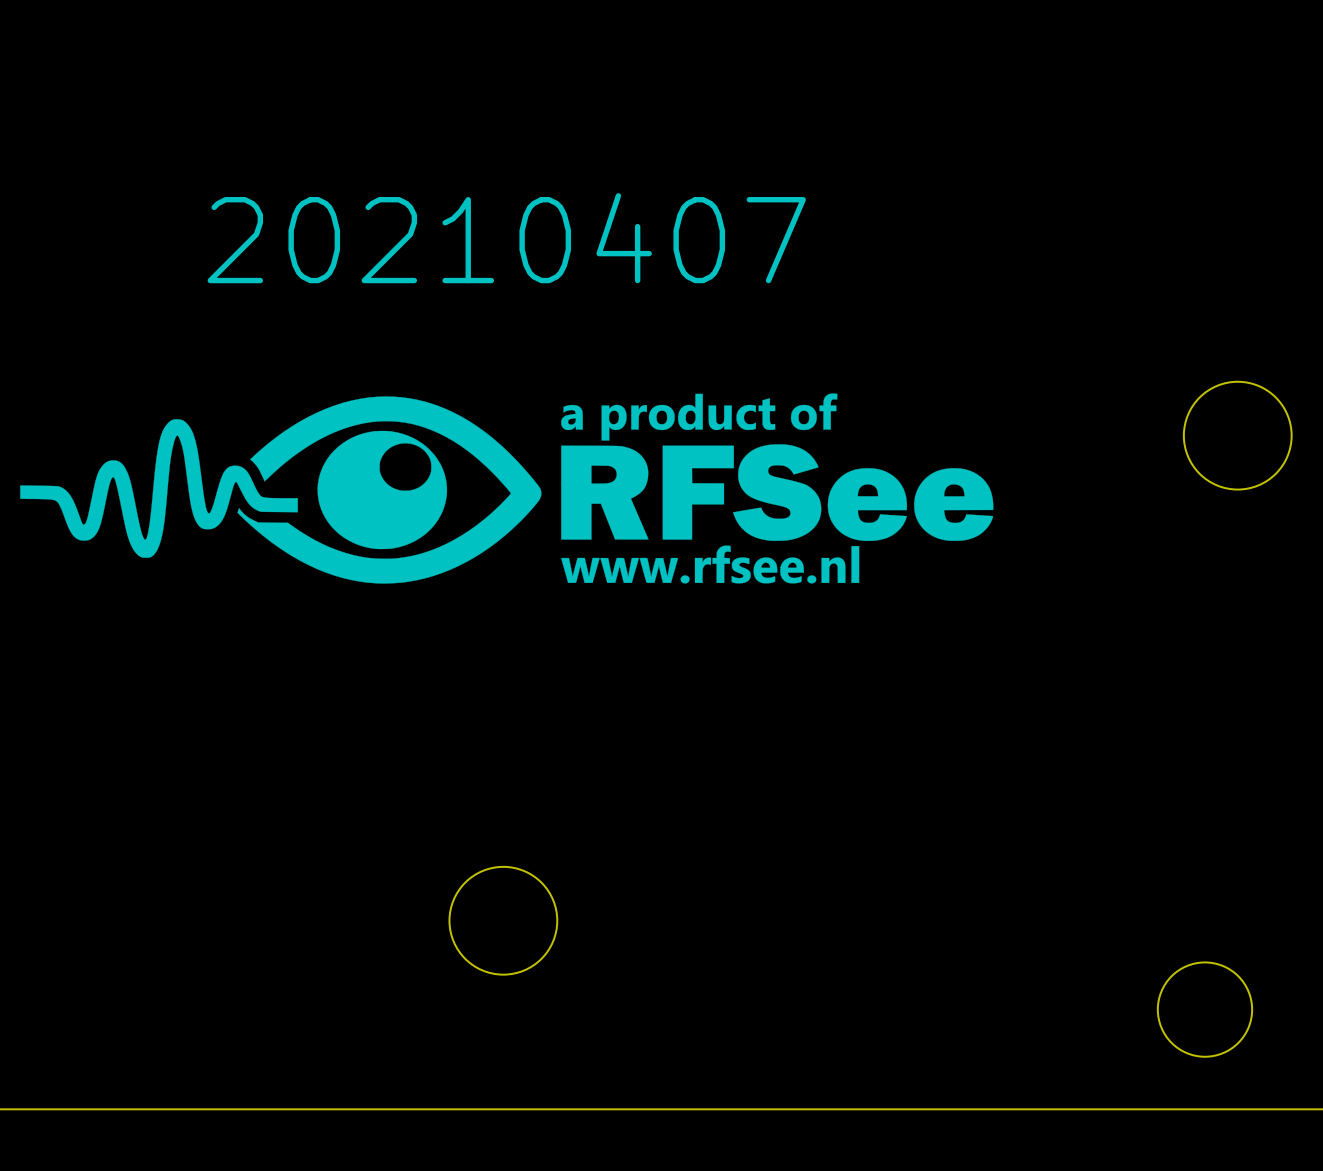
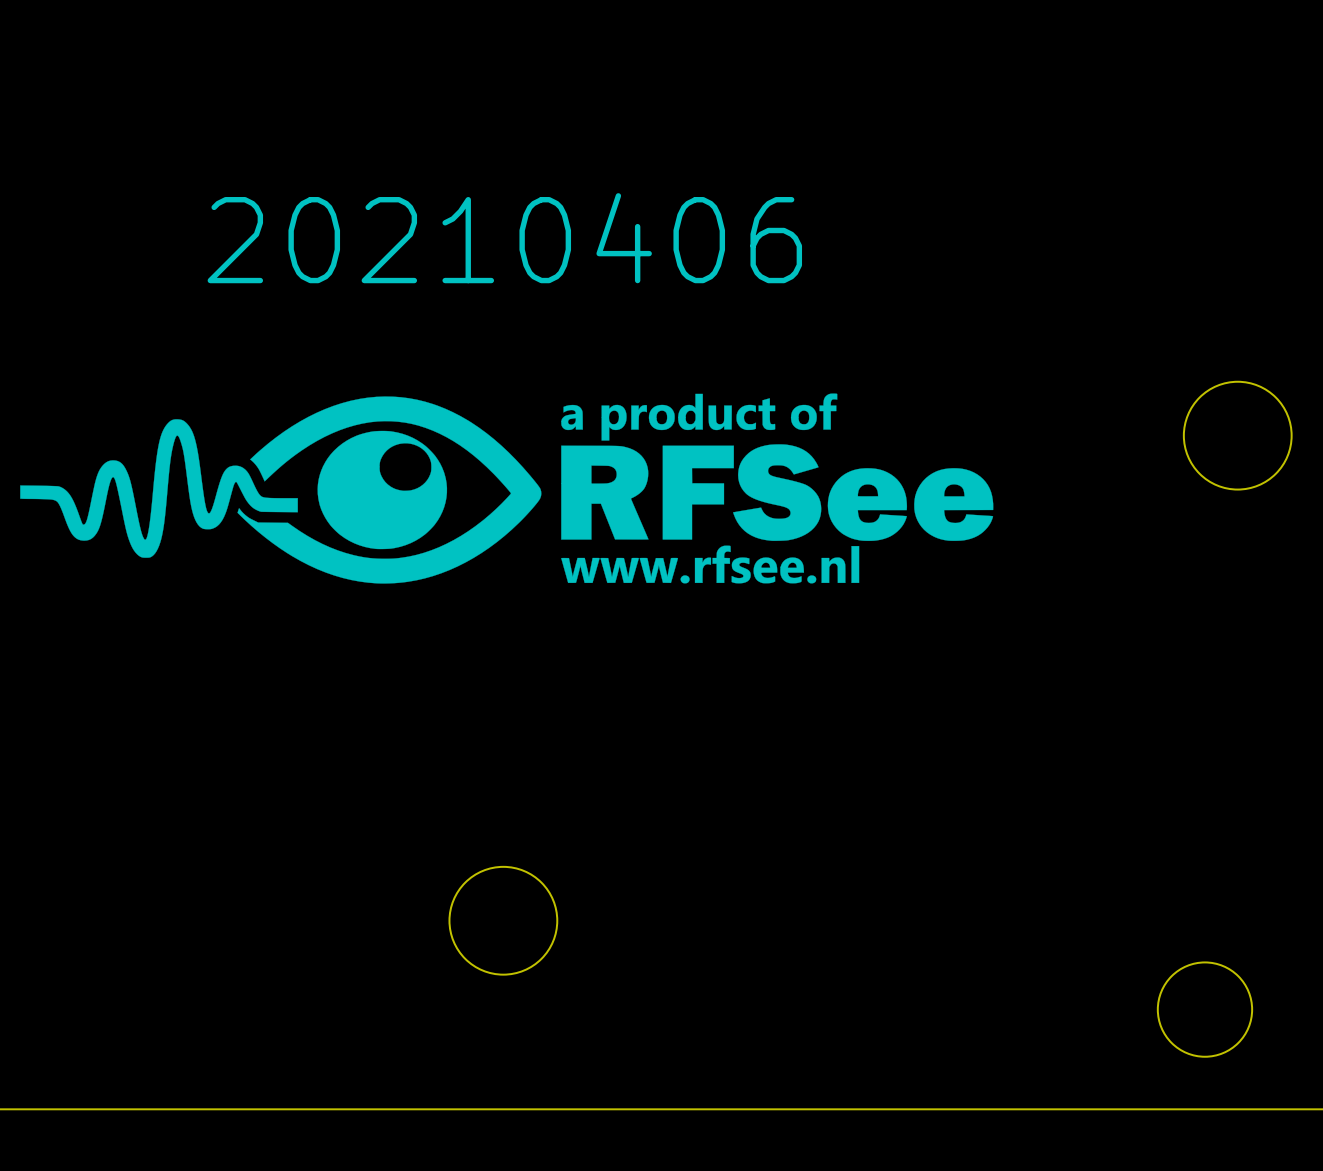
text: 20210407 (506, 238) -> 20210406 (504, 238)

